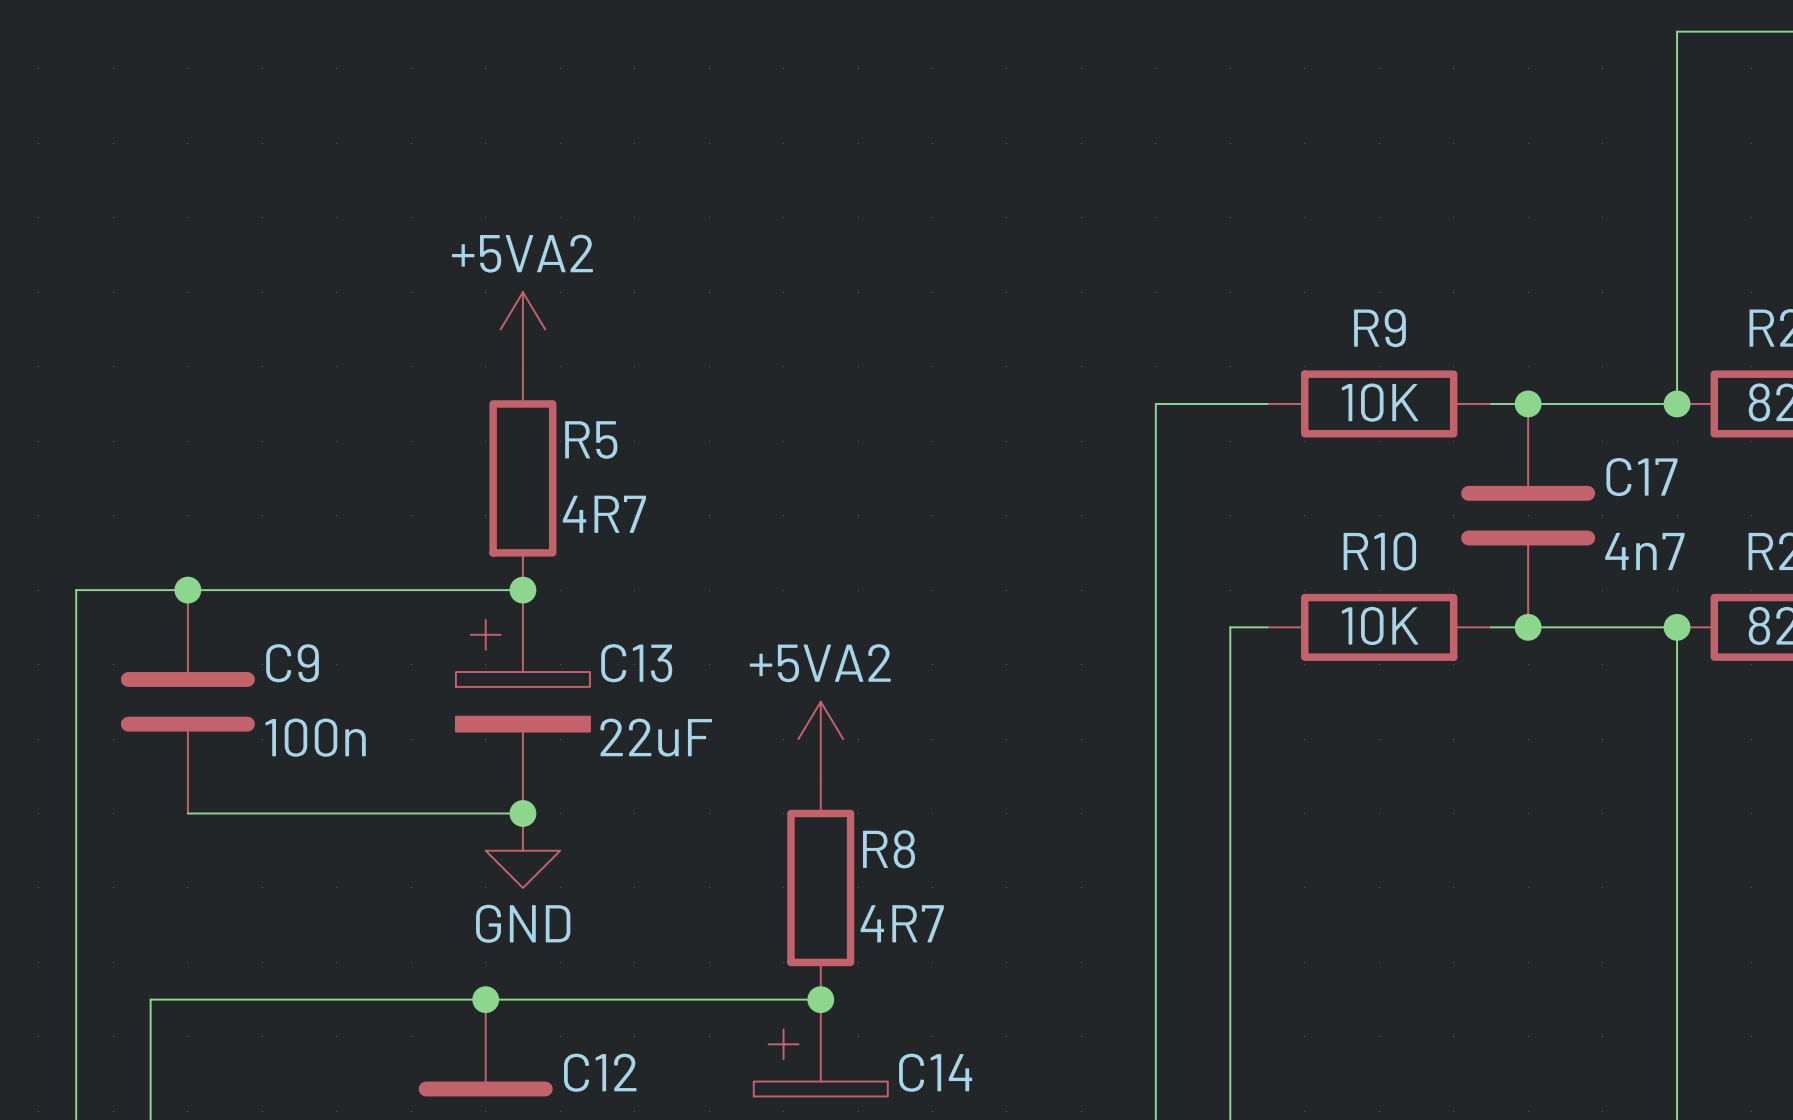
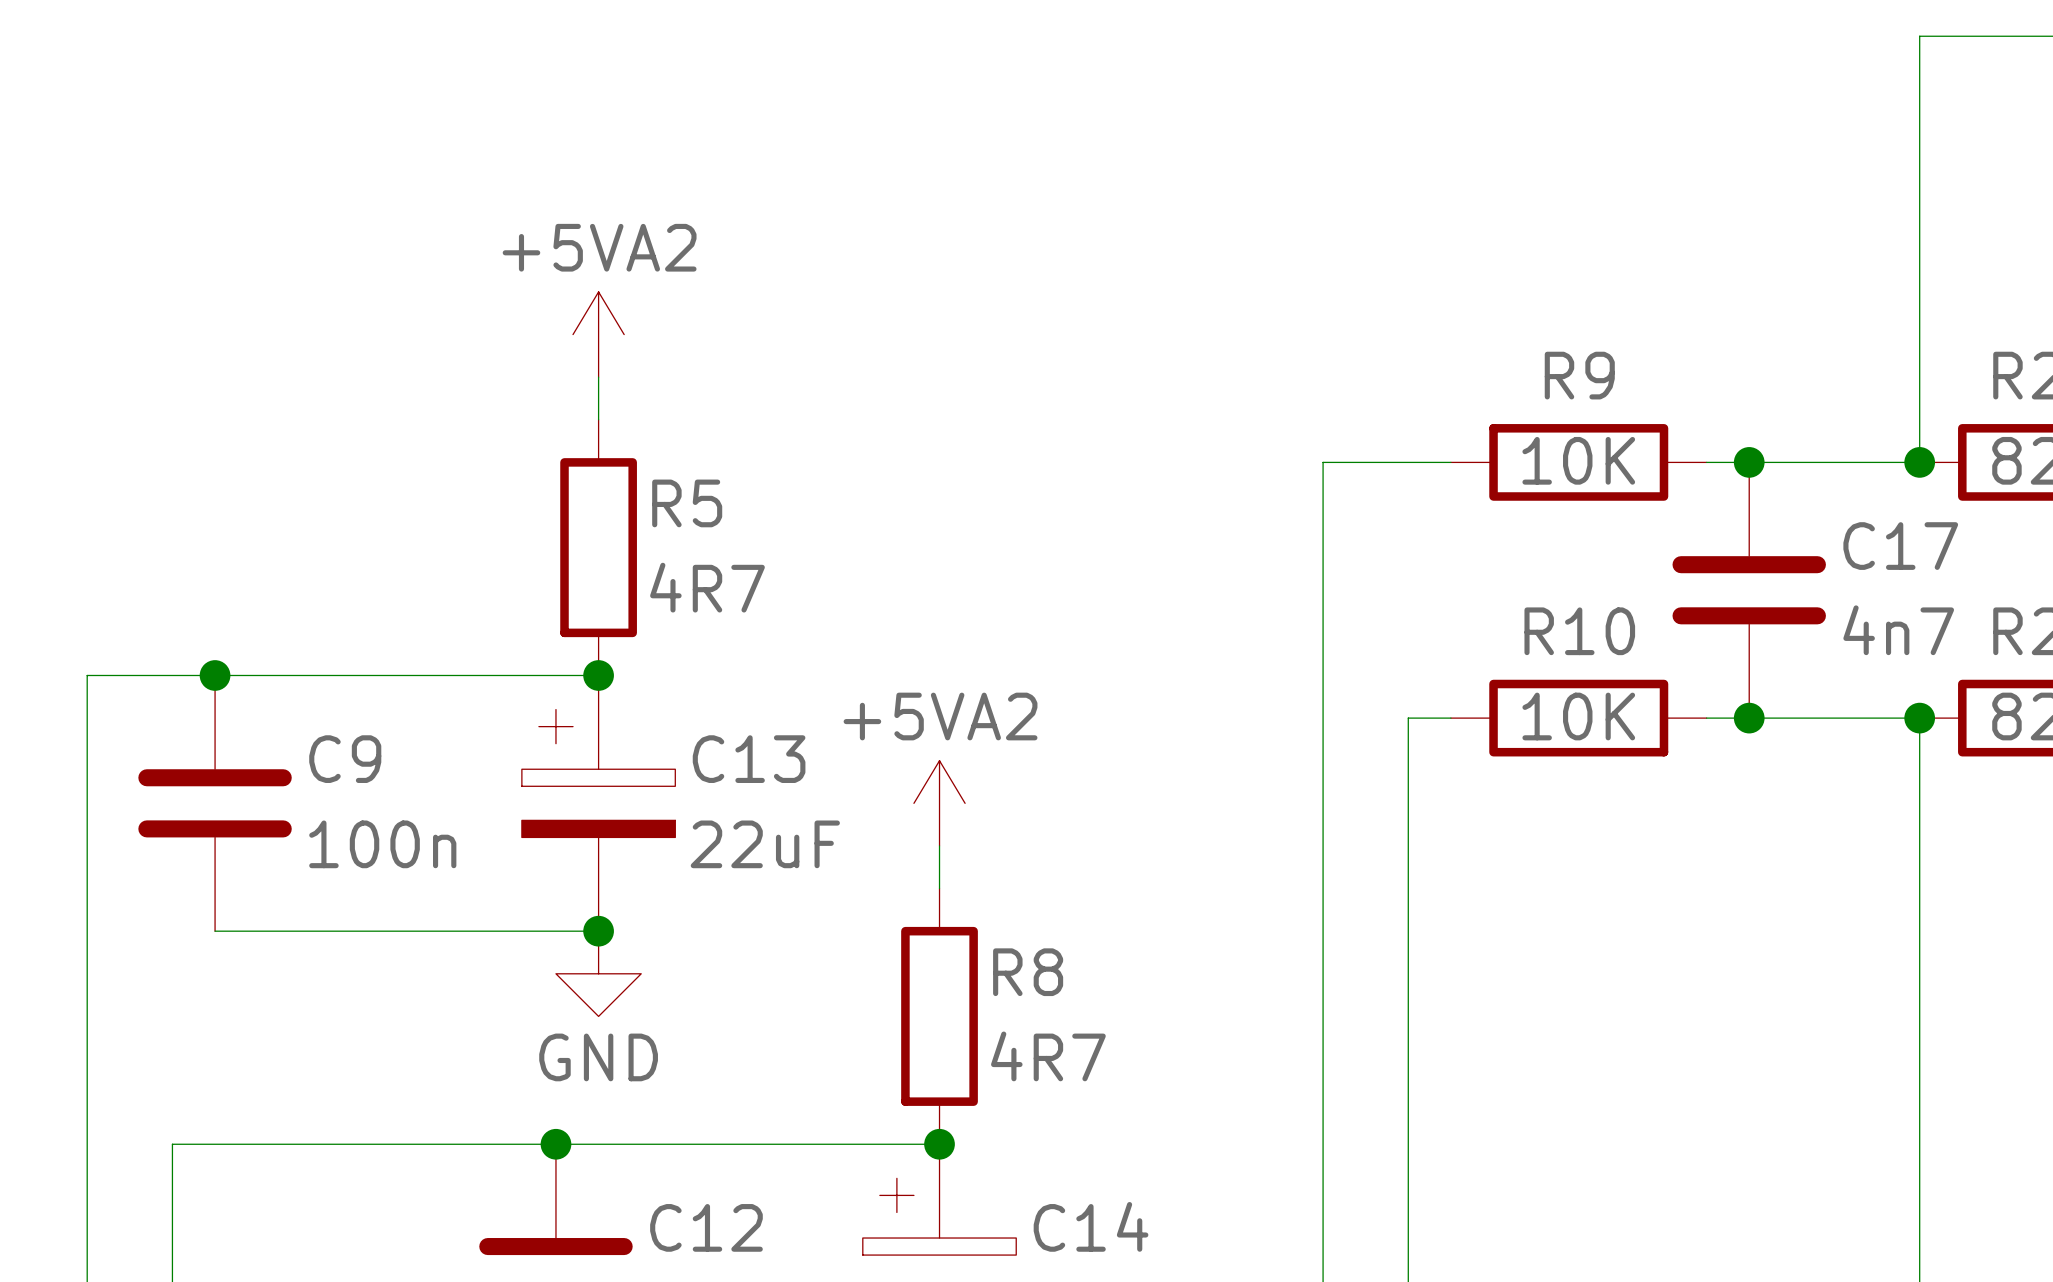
power symbol position: +5VA2 (522, 329) -> +5VA2 (598, 334)
power symbol position: +5VA2 (820, 739) -> +5VA2 (939, 803)

